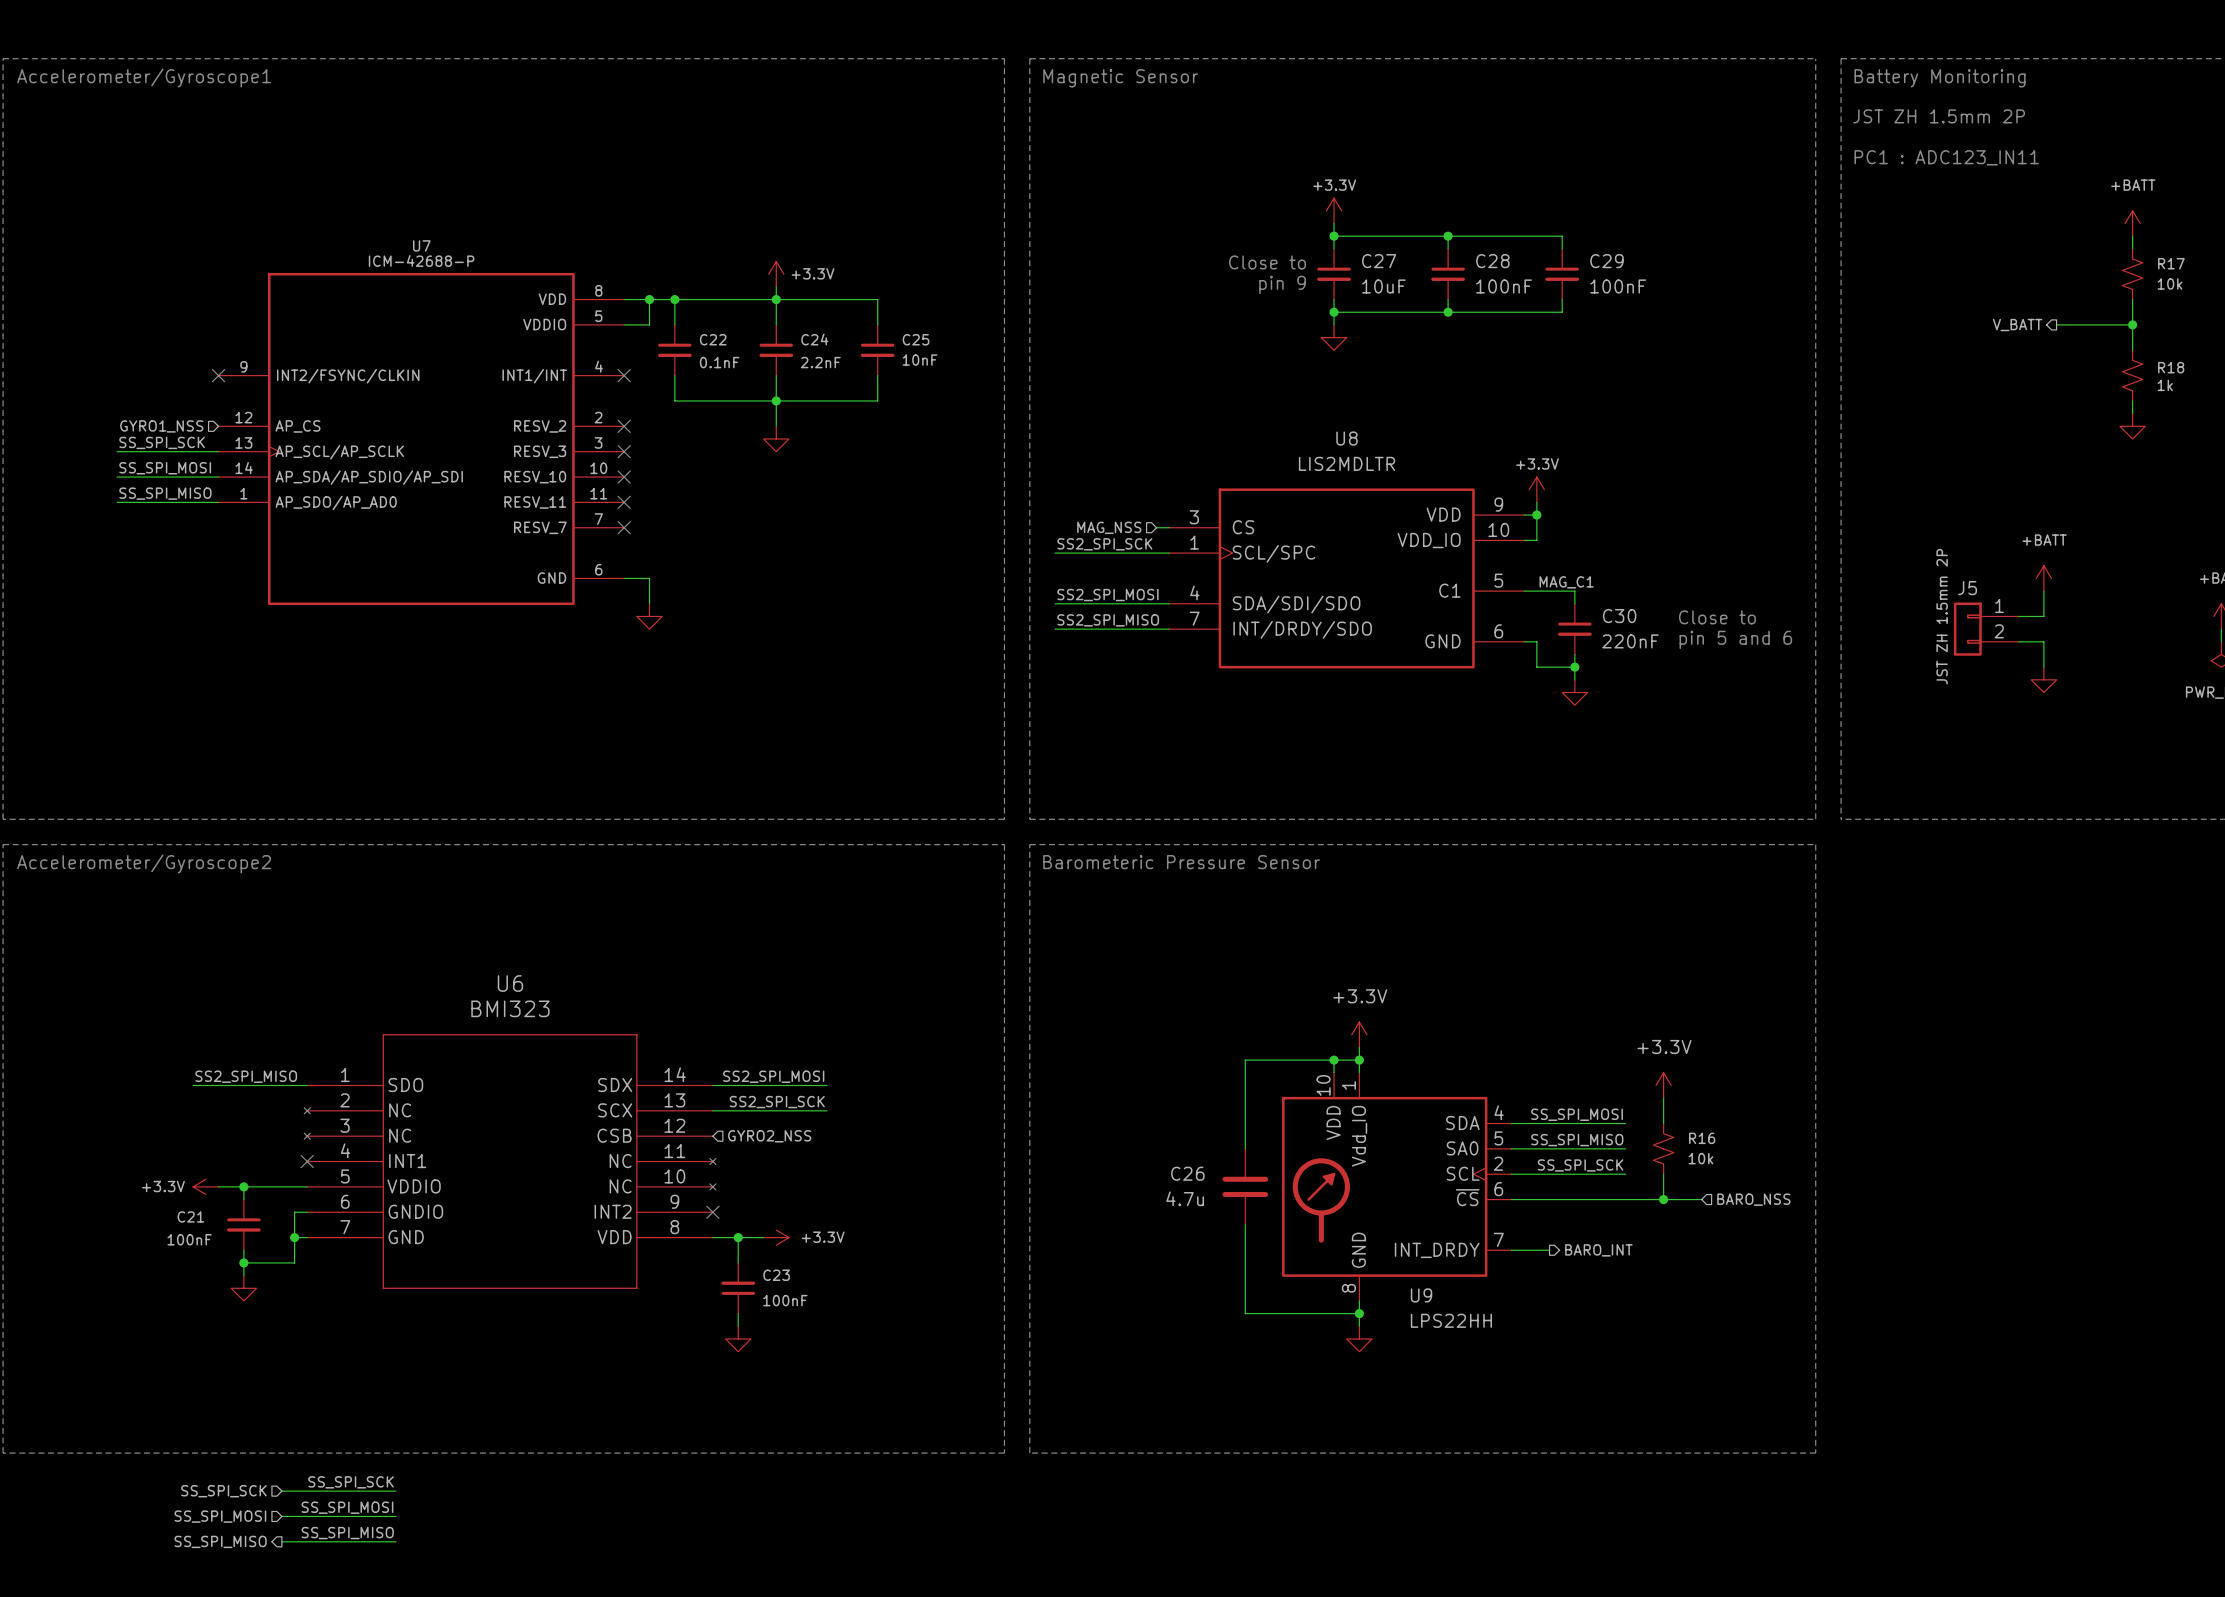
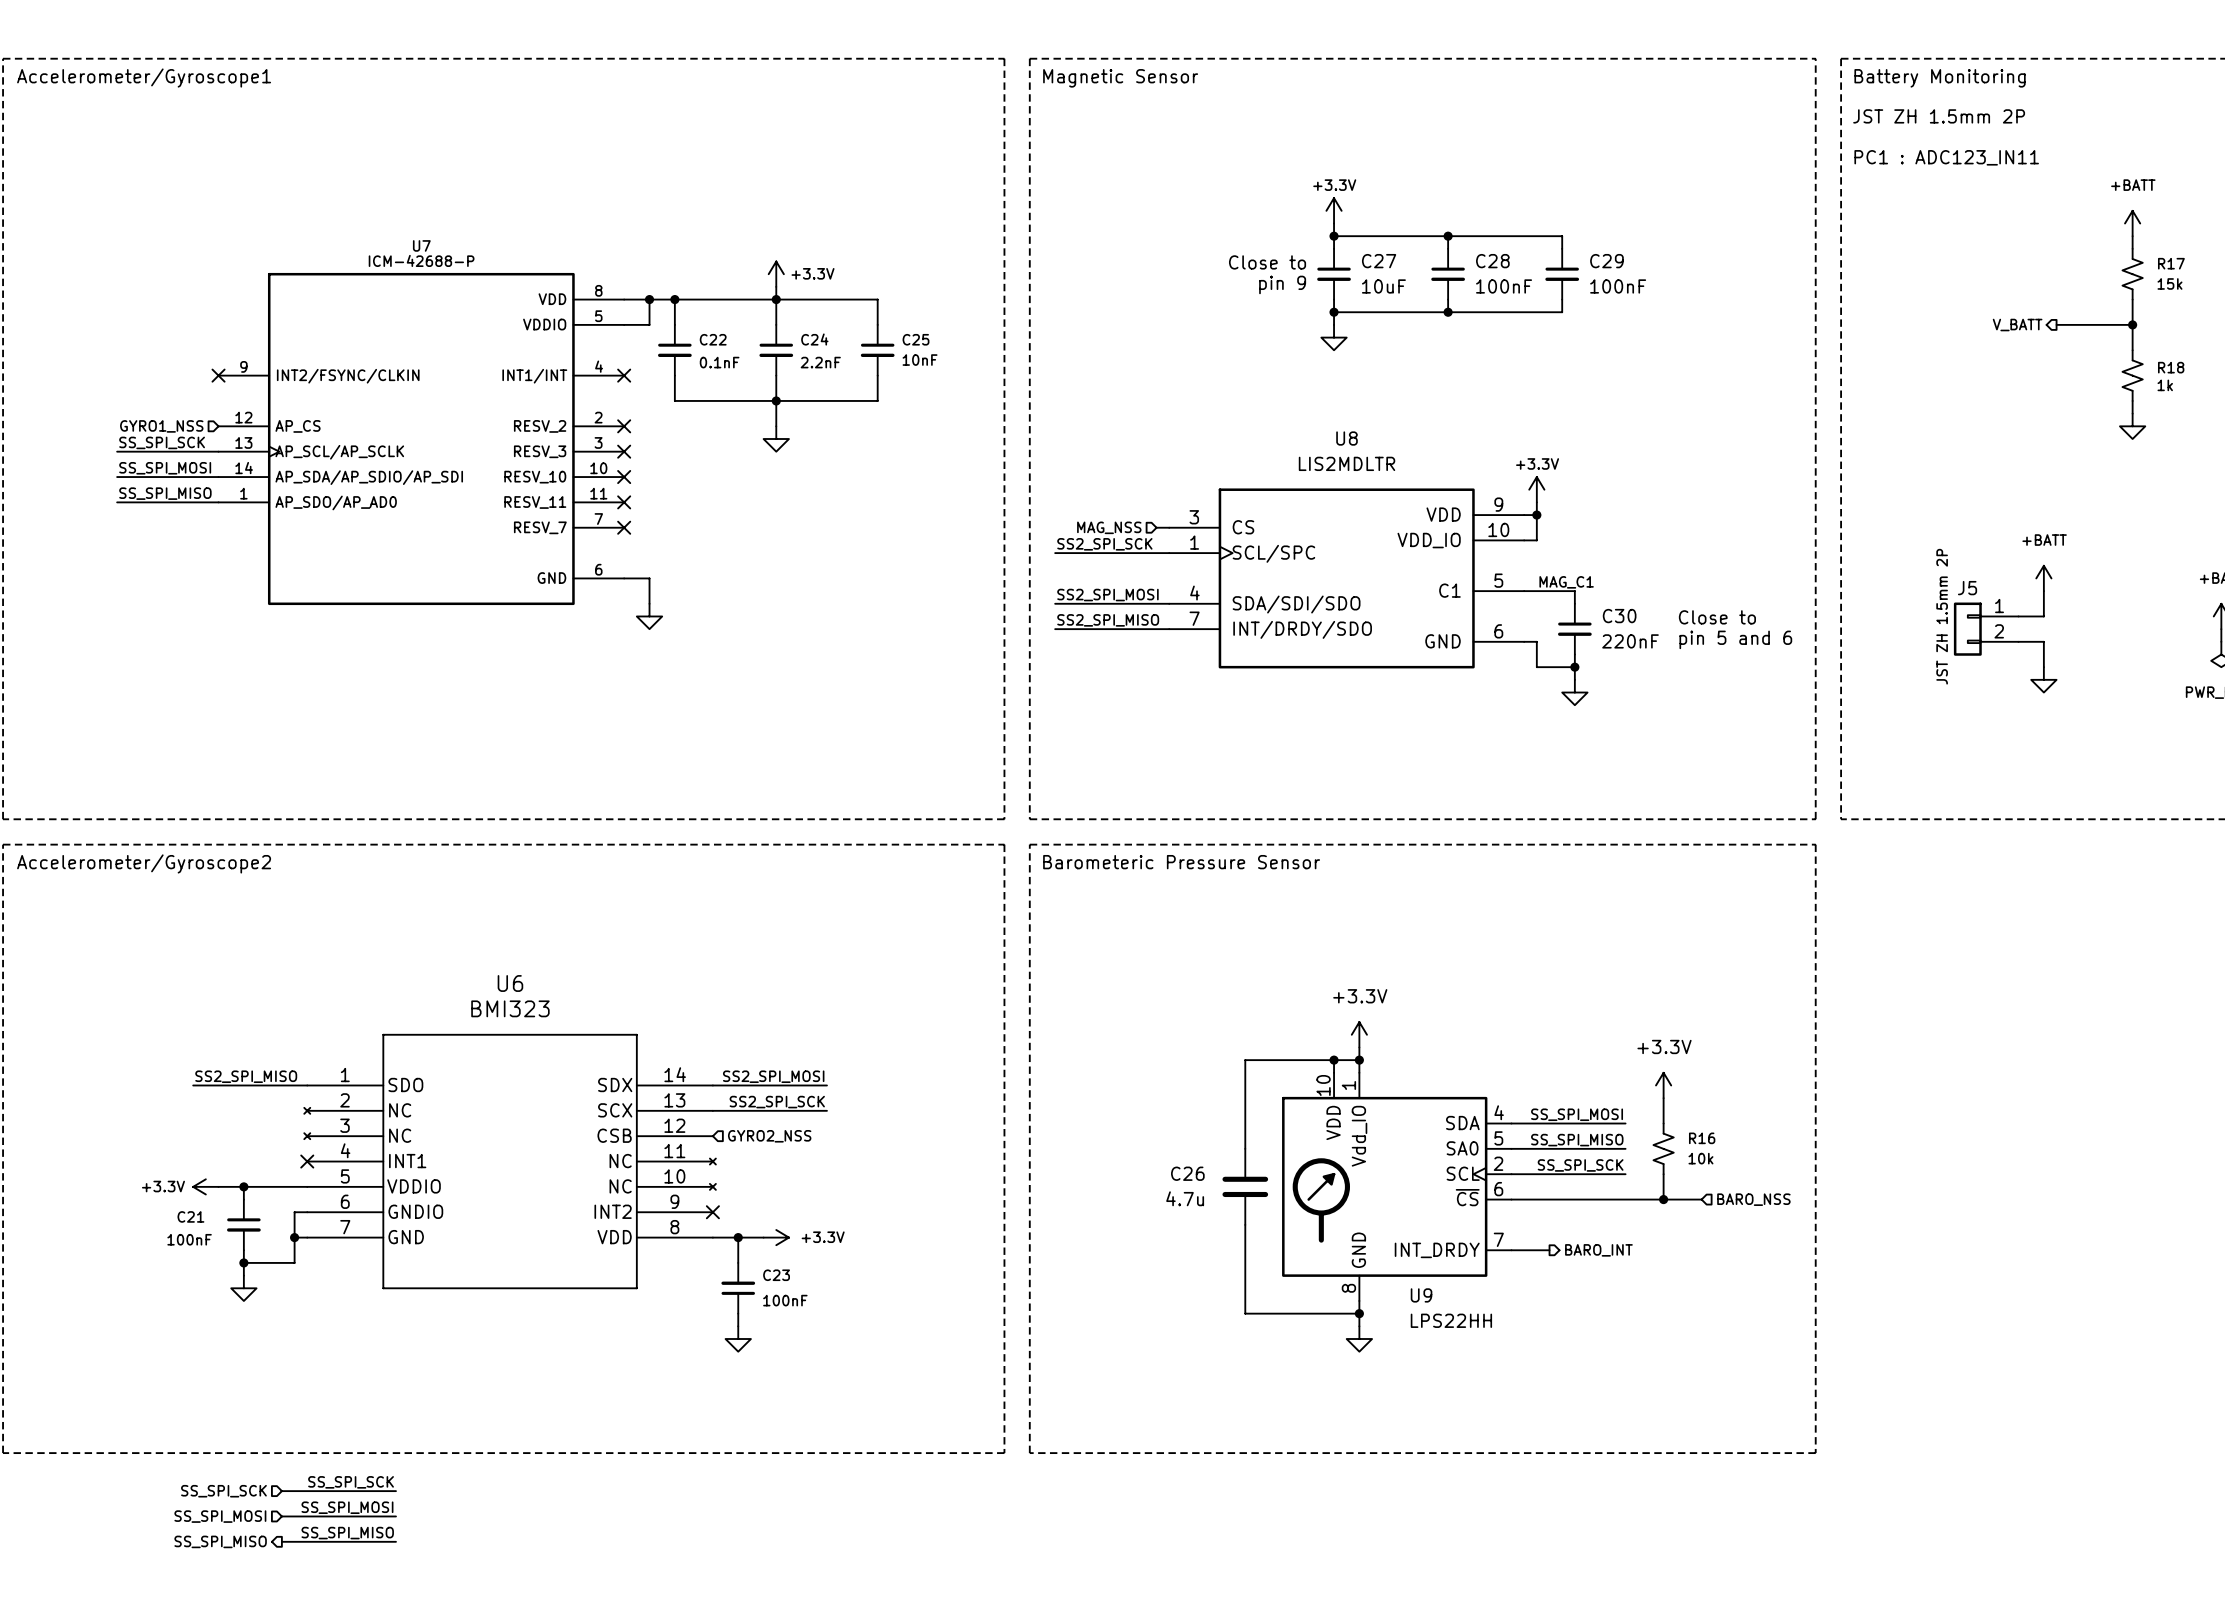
R17 value: 10k (2169, 283) -> 15k (2169, 283)

